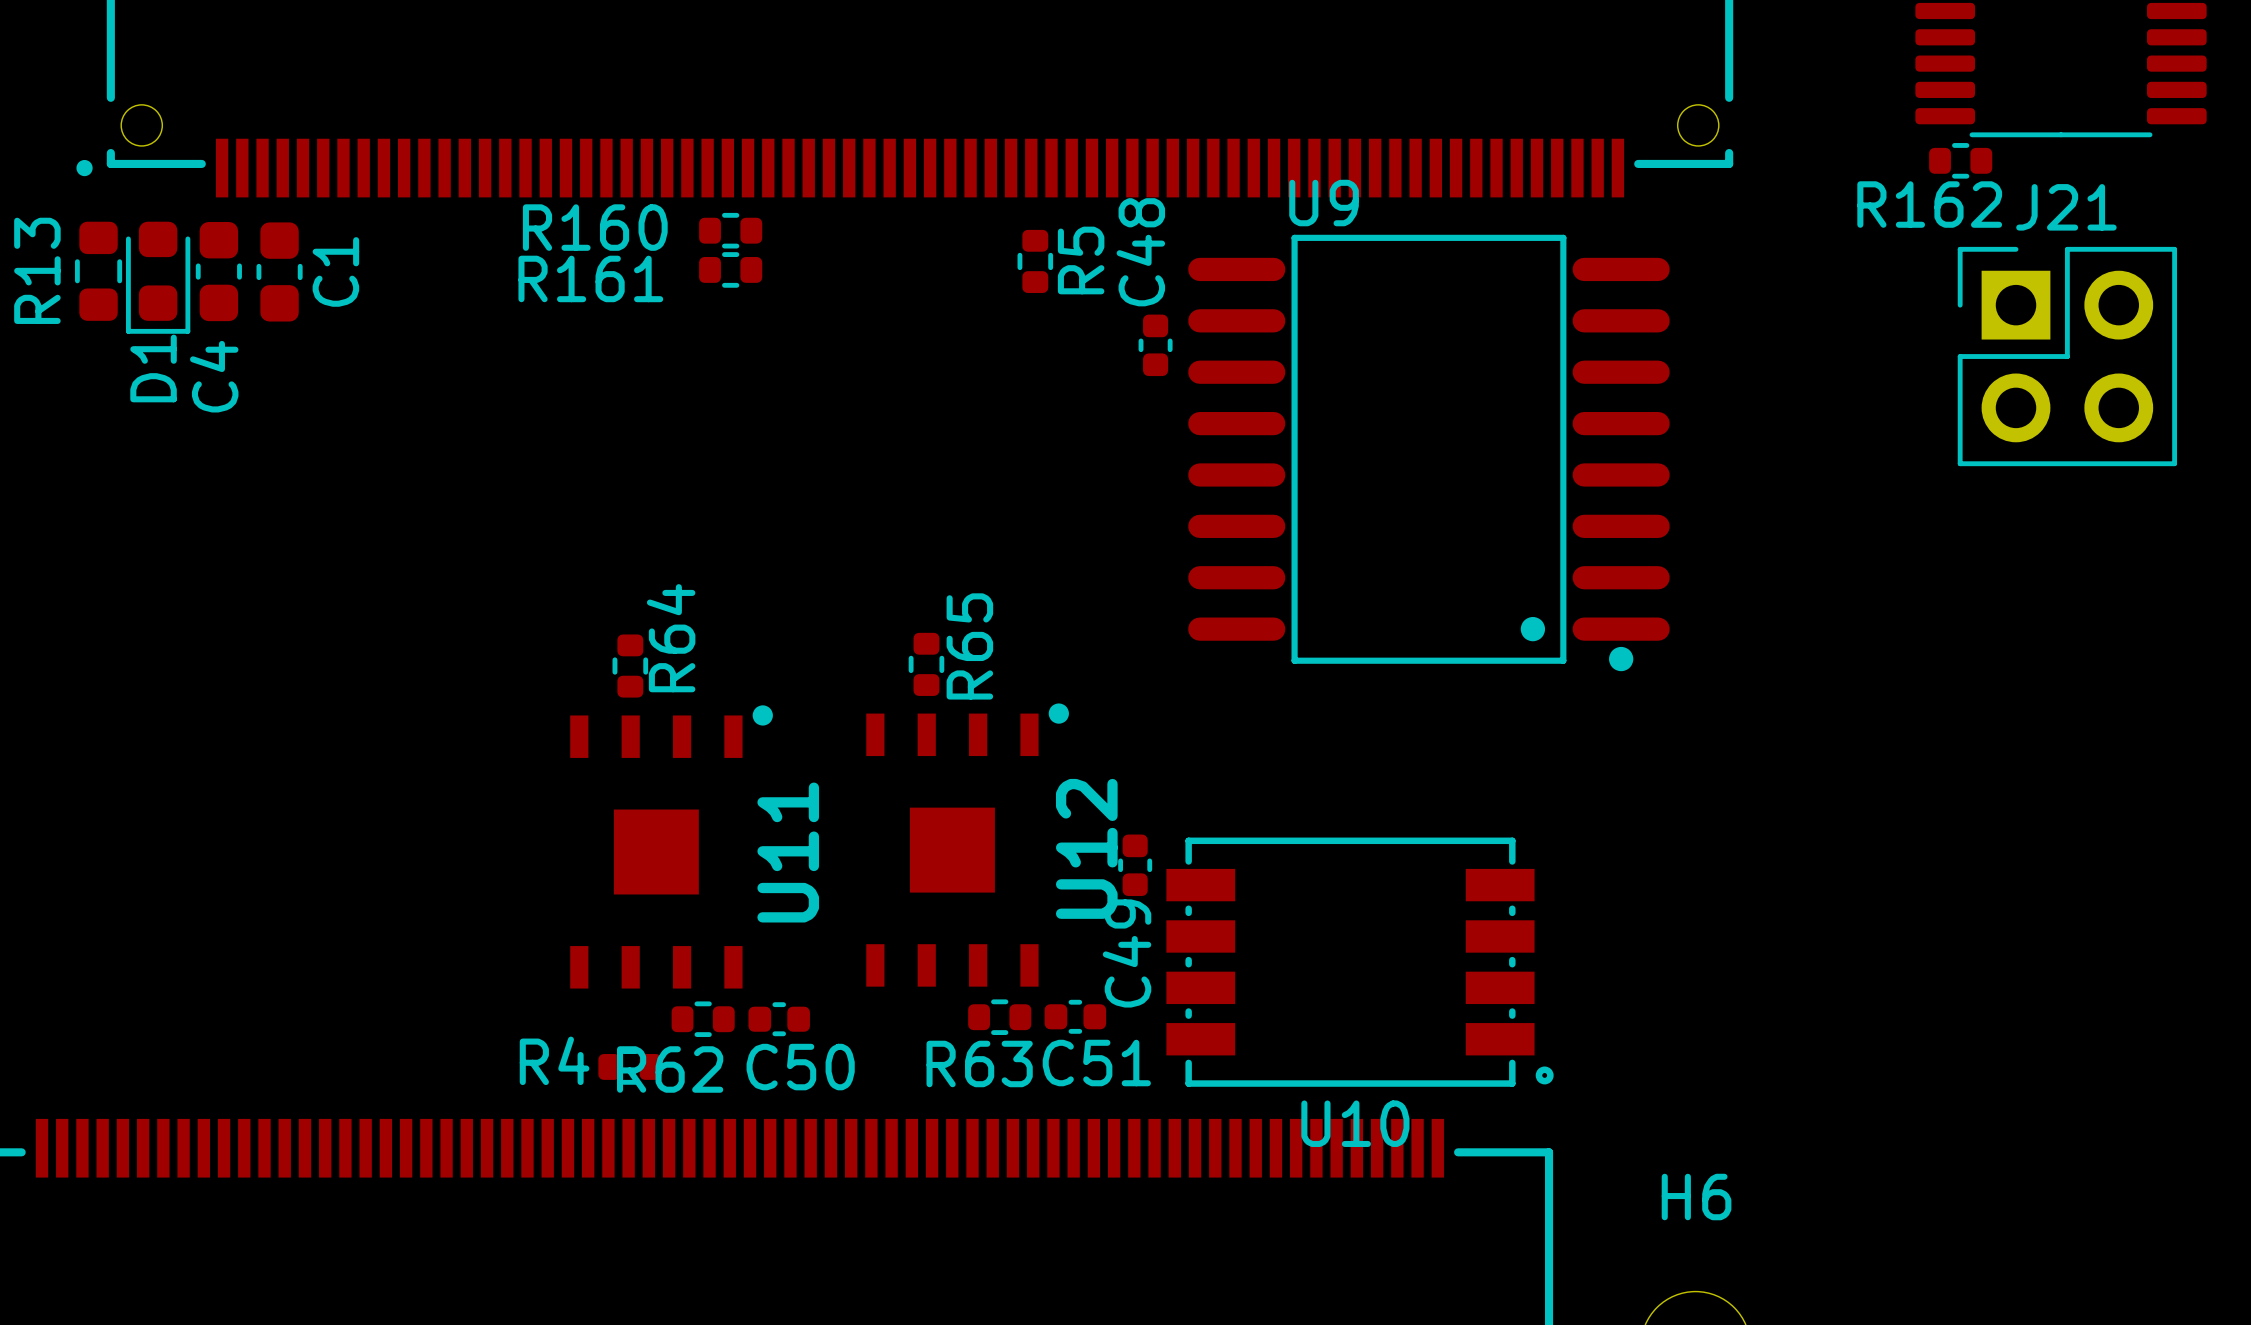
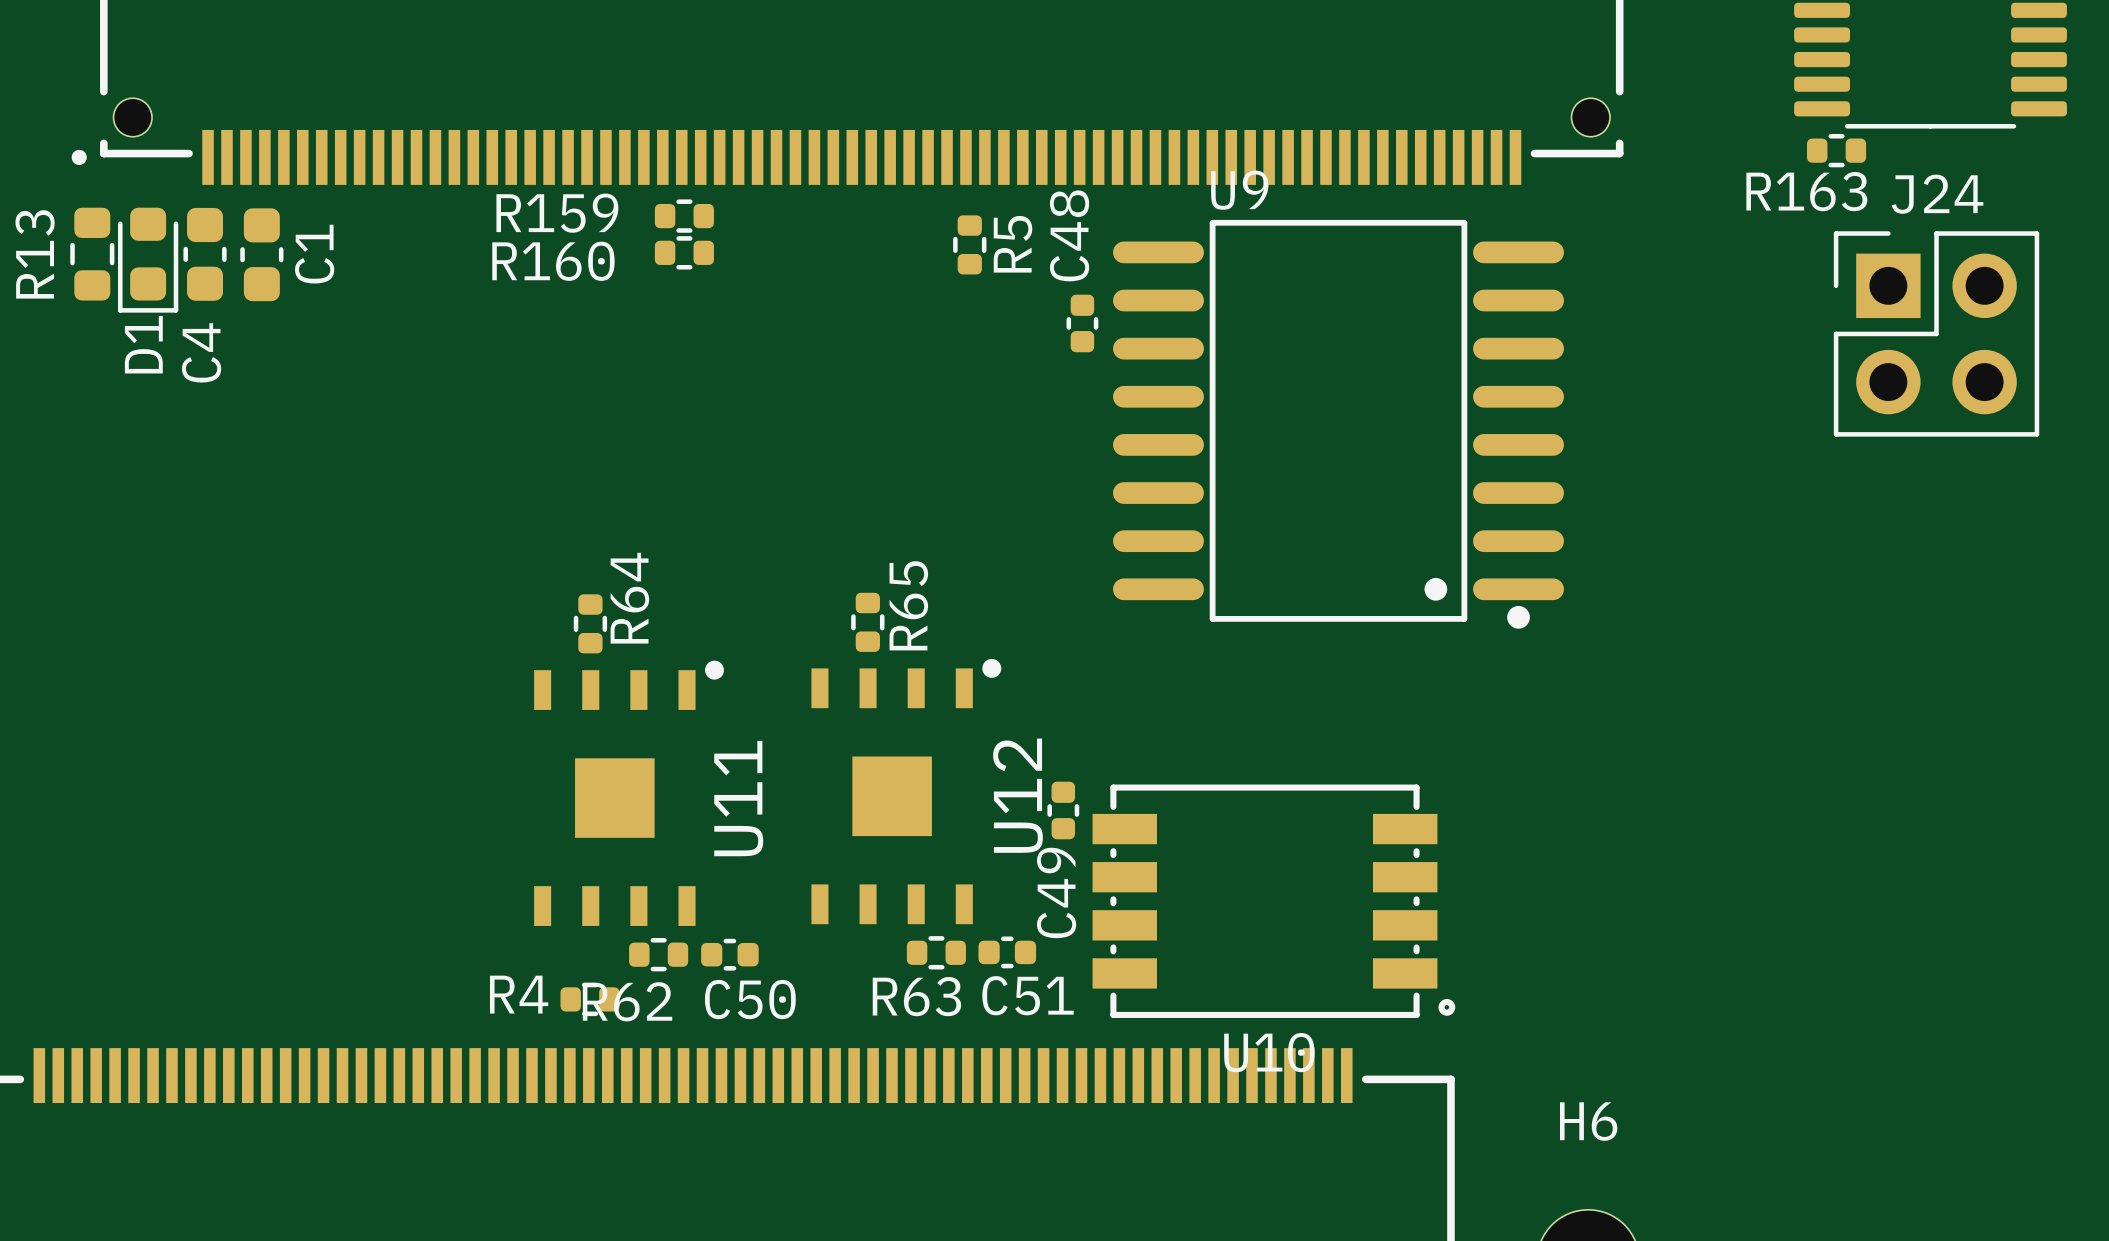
R162 name: R162 (1929, 204) -> R163 (1806, 191)
J21 name: J21 (2066, 207) -> J24 (1937, 194)
R160 name: R160 (595, 227) -> R159 (557, 213)
R161 name: R161 (590, 278) -> R160 (553, 261)

